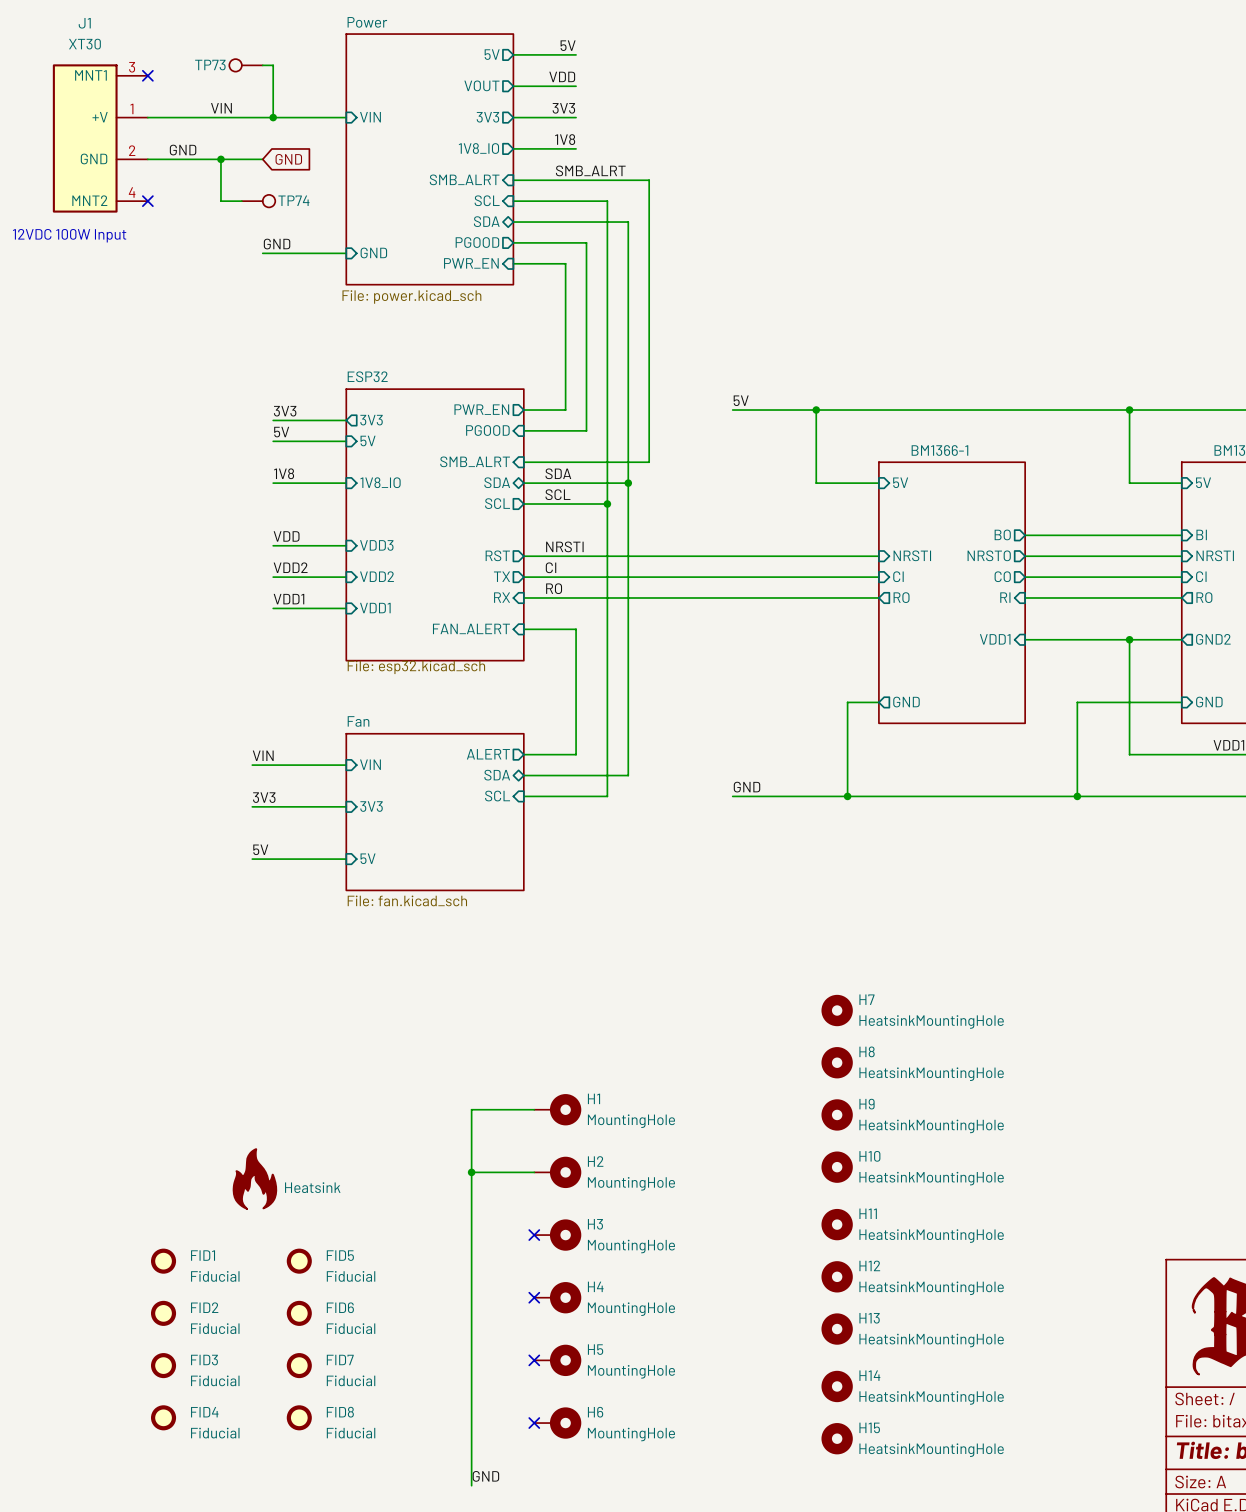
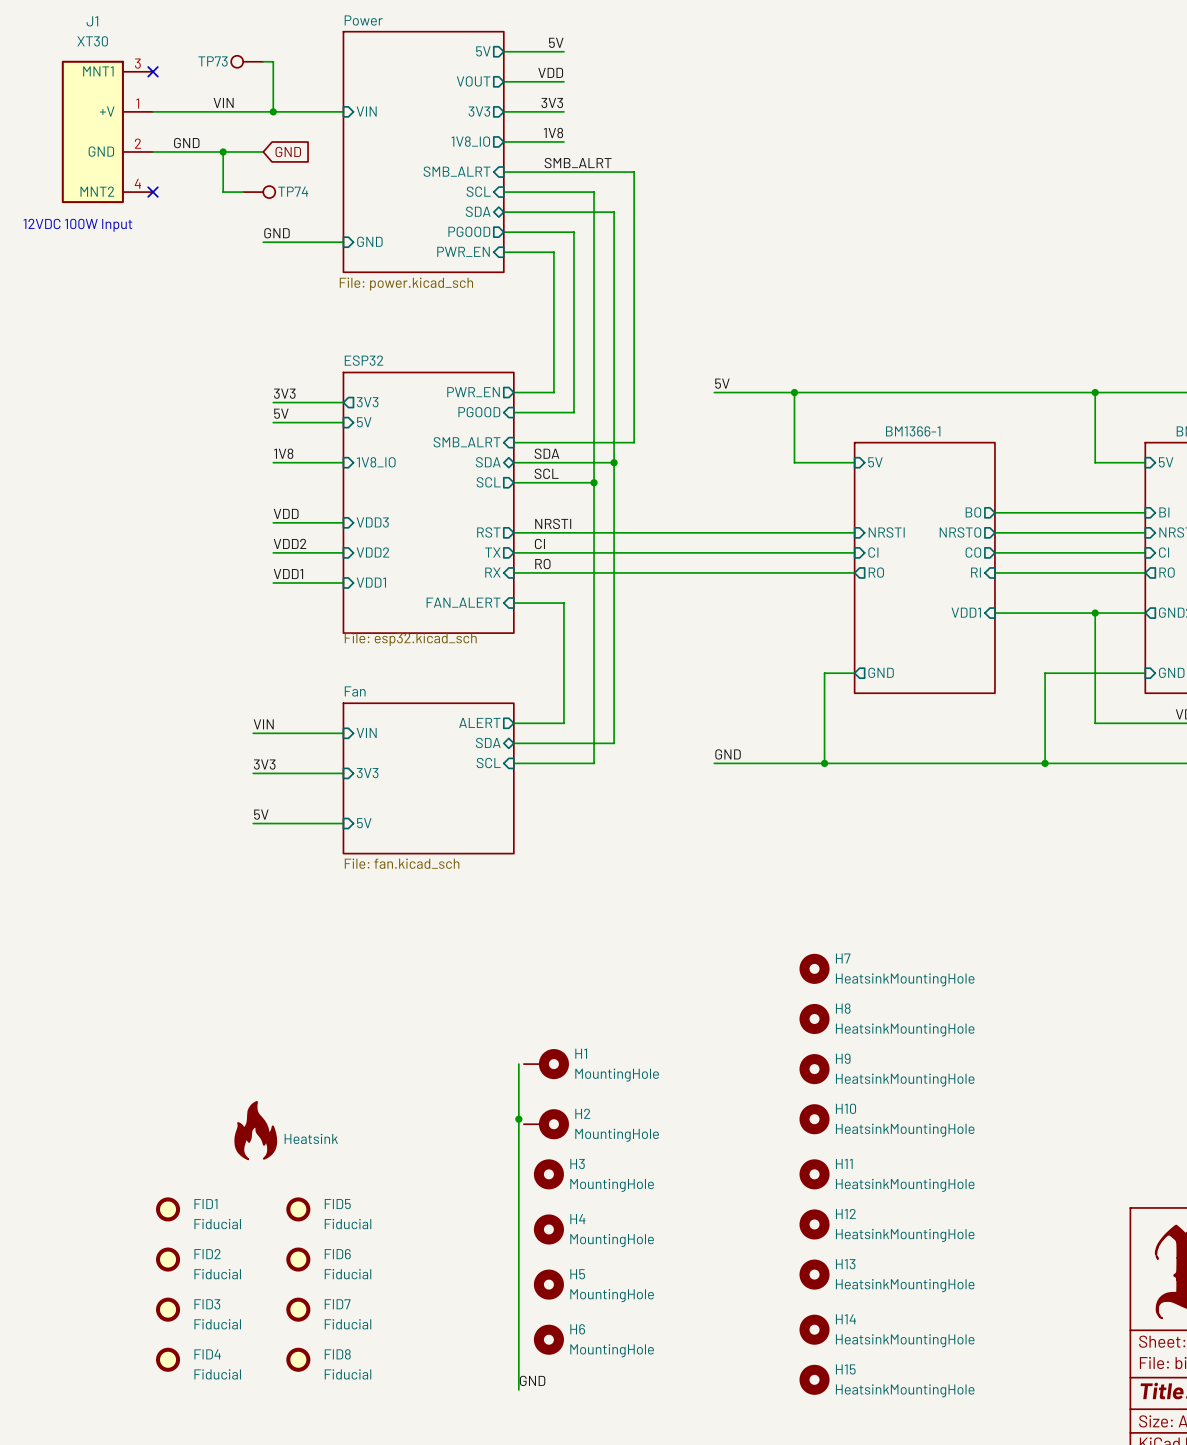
wire: none -> (518, 1064) (518, 1389)
wire: (534, 1109) (471, 1109) (471, 1485) -> none
junction: none -> (518, 1119)
wire: (471, 1172) (534, 1172) -> none
junction: (471, 1172) -> none
H3 symbol: [534, 1219, 582, 1251] -> [533, 1159, 564, 1190]
no-connect mark: (534, 1235) -> none
H4 symbol: [534, 1282, 582, 1314] -> [533, 1214, 564, 1245]
no-connect mark: (534, 1297) -> none
H5 symbol: [534, 1344, 582, 1377] -> [533, 1269, 564, 1300]
no-connect mark: (534, 1360) -> none
H6 symbol: [534, 1407, 582, 1439] -> [533, 1324, 564, 1355]
no-connect mark: (534, 1423) -> none
label position: GND (485, 1476) -> GND (532, 1380)

